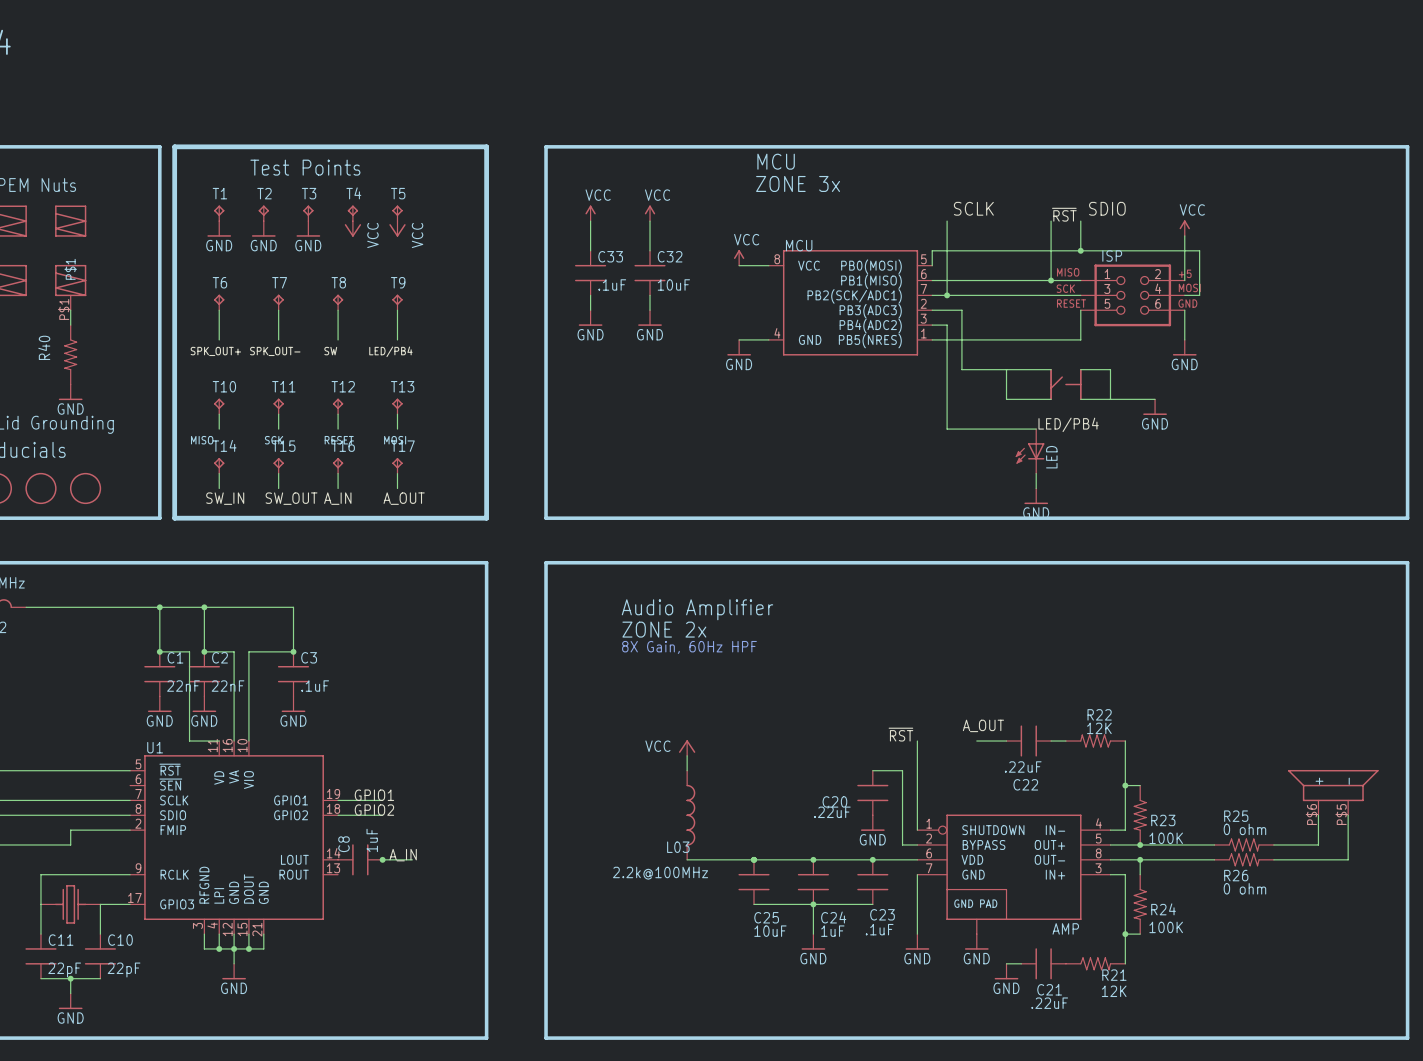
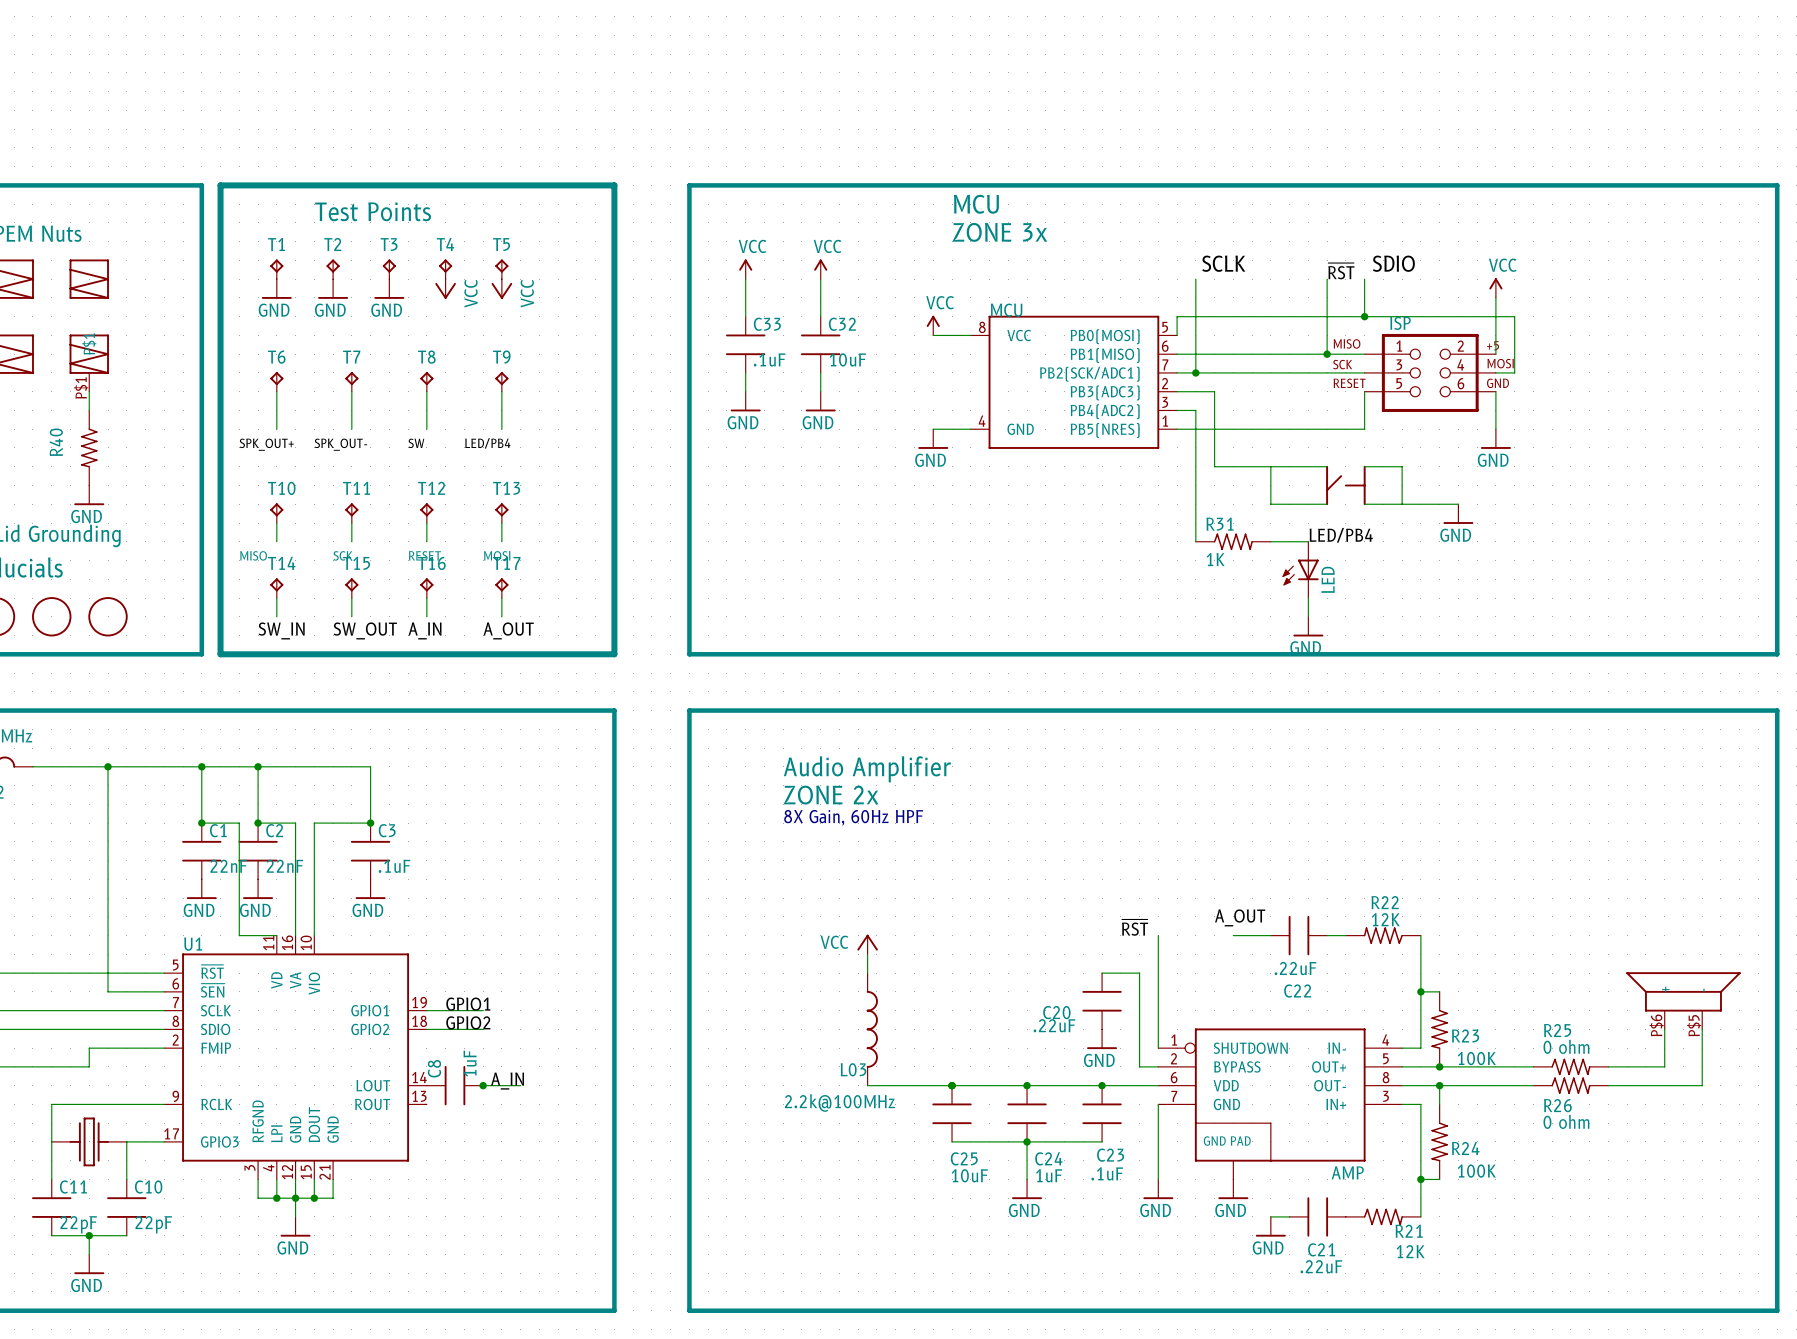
R31: none -> 1K (1233, 541)
wire: none -> (108, 766) (108, 991) (164, 991)
junction: none -> (108, 766)

